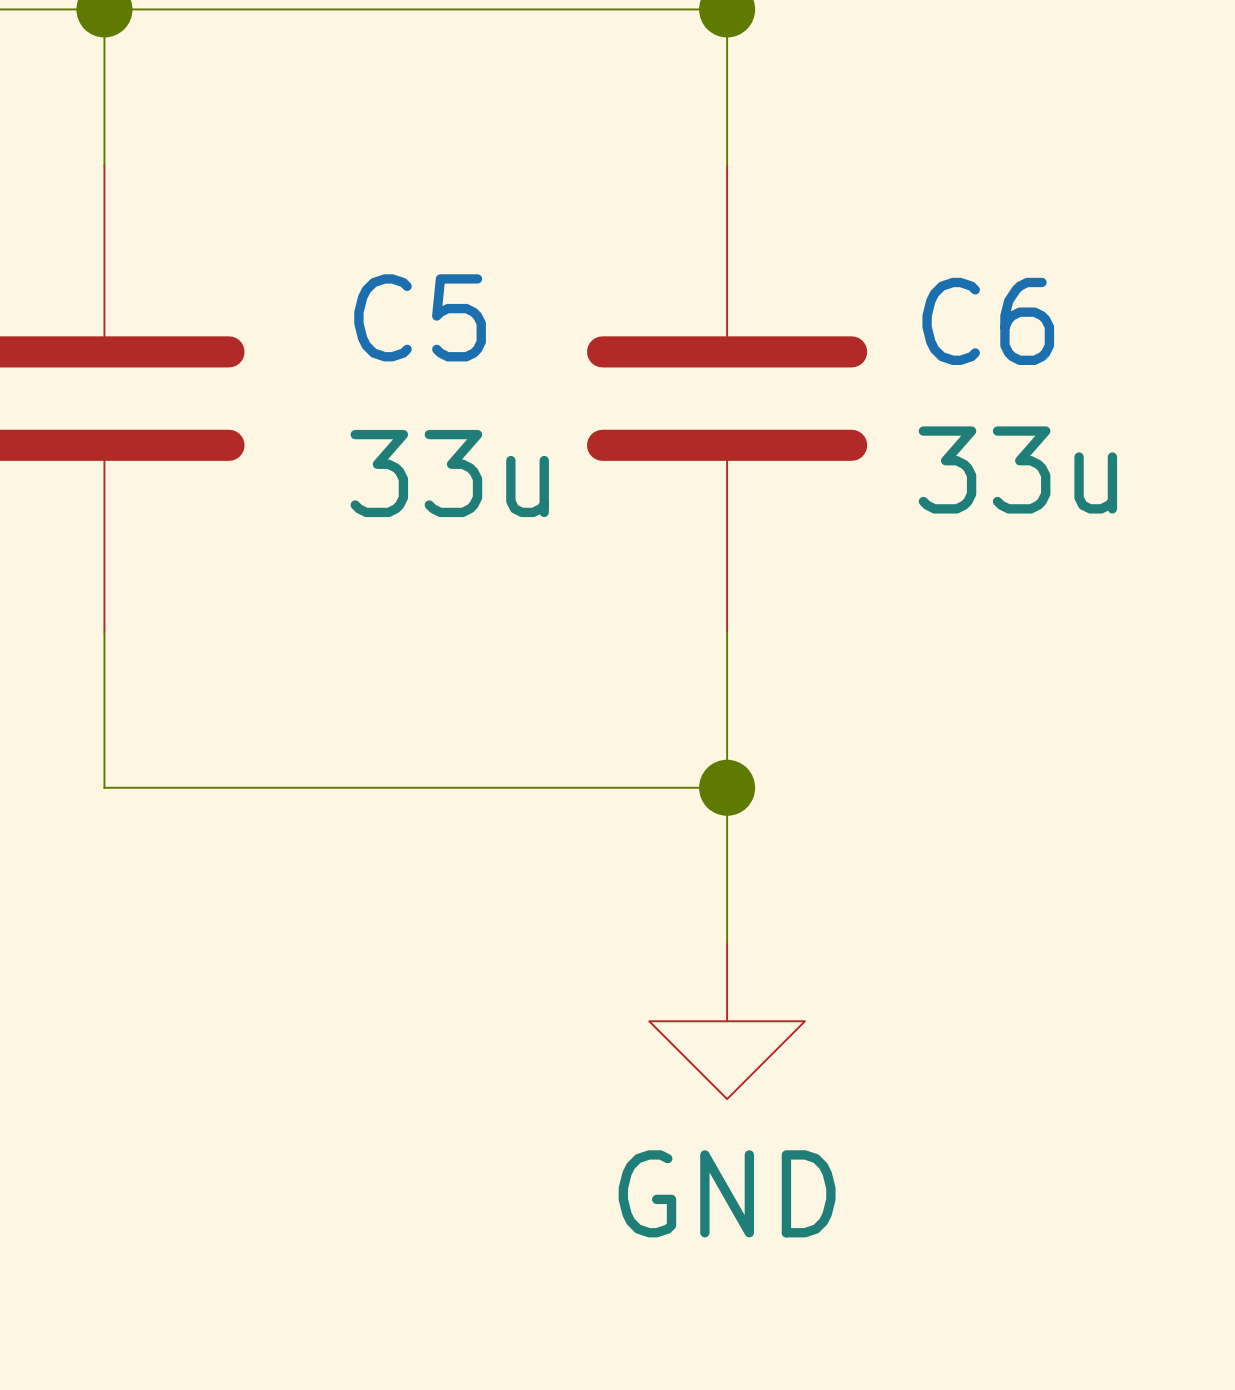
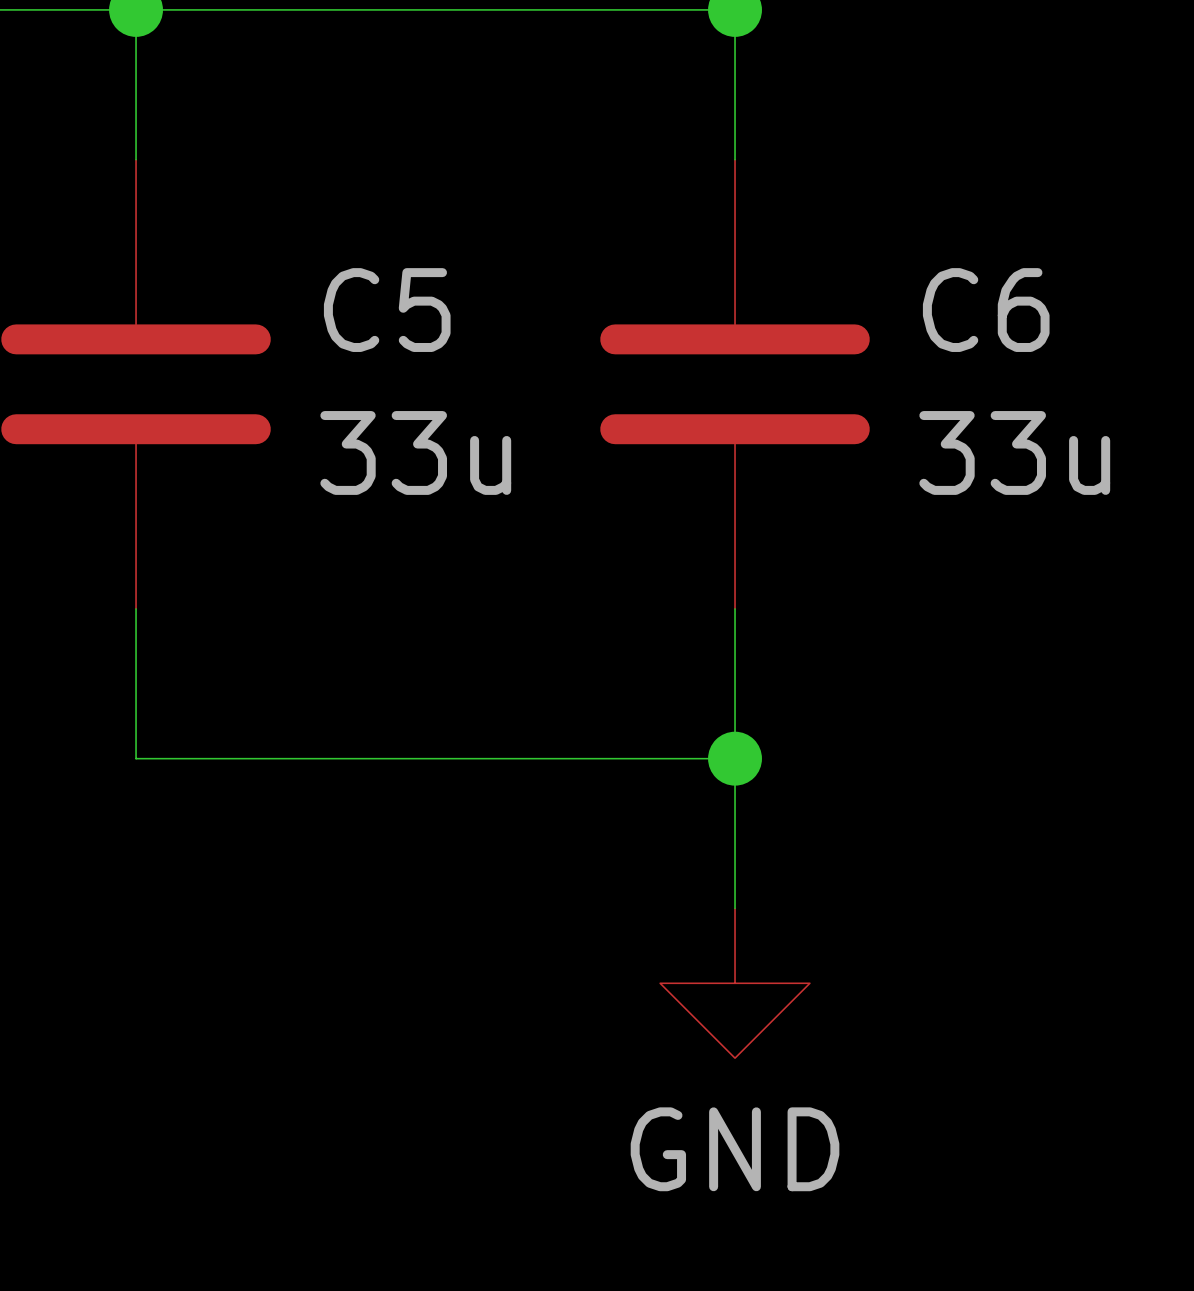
C5 name position: C5 (420, 317) -> C5 (387, 310)
C5 value position: 33u (449, 473) -> 33u (415, 452)

